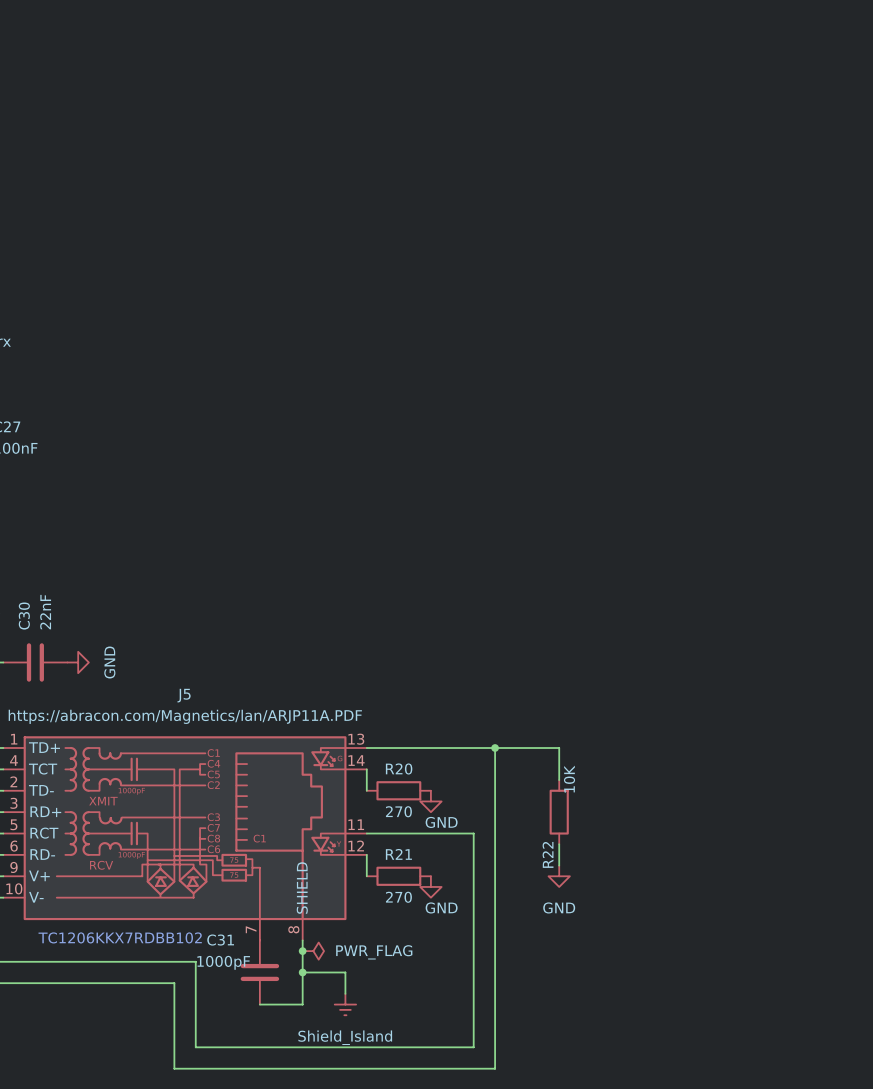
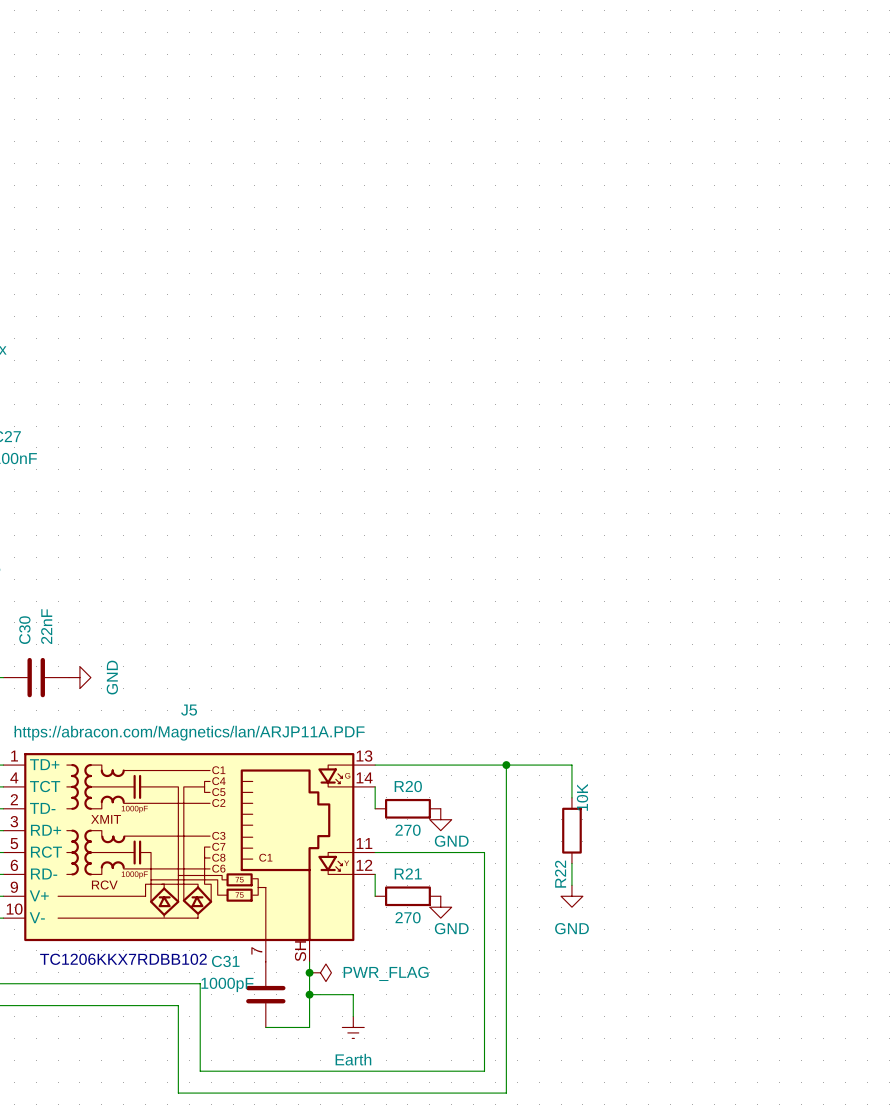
J5 pin name: SHIELD (302, 888) -> none
J5 pin number: 8 (293, 929) -> SH (300, 951)
power symbol: Shield_Island (345, 1004) -> Earth (353, 1027)

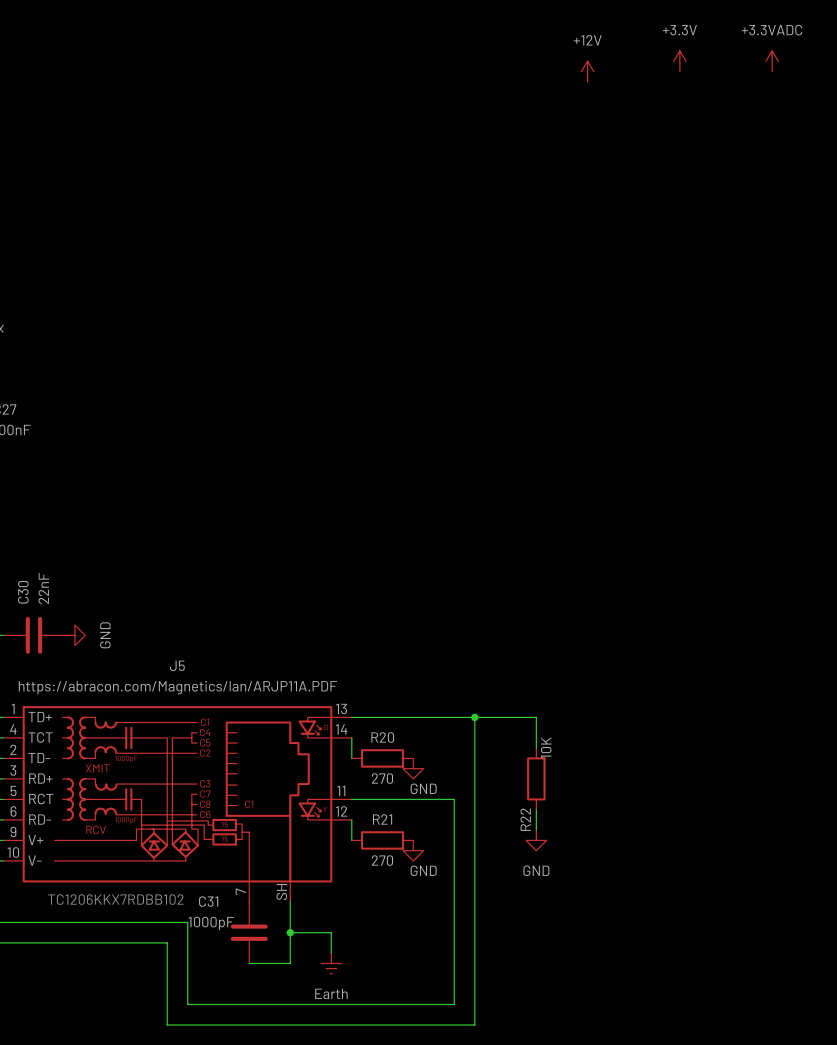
power symbol: none -> +3.3V (679, 61)
power symbol: none -> +3.3VADC (772, 61)
power symbol: none -> +12V (587, 71)
junction: (309, 972) -> none
power symbol: PWR_FLAG (320, 972) -> none

